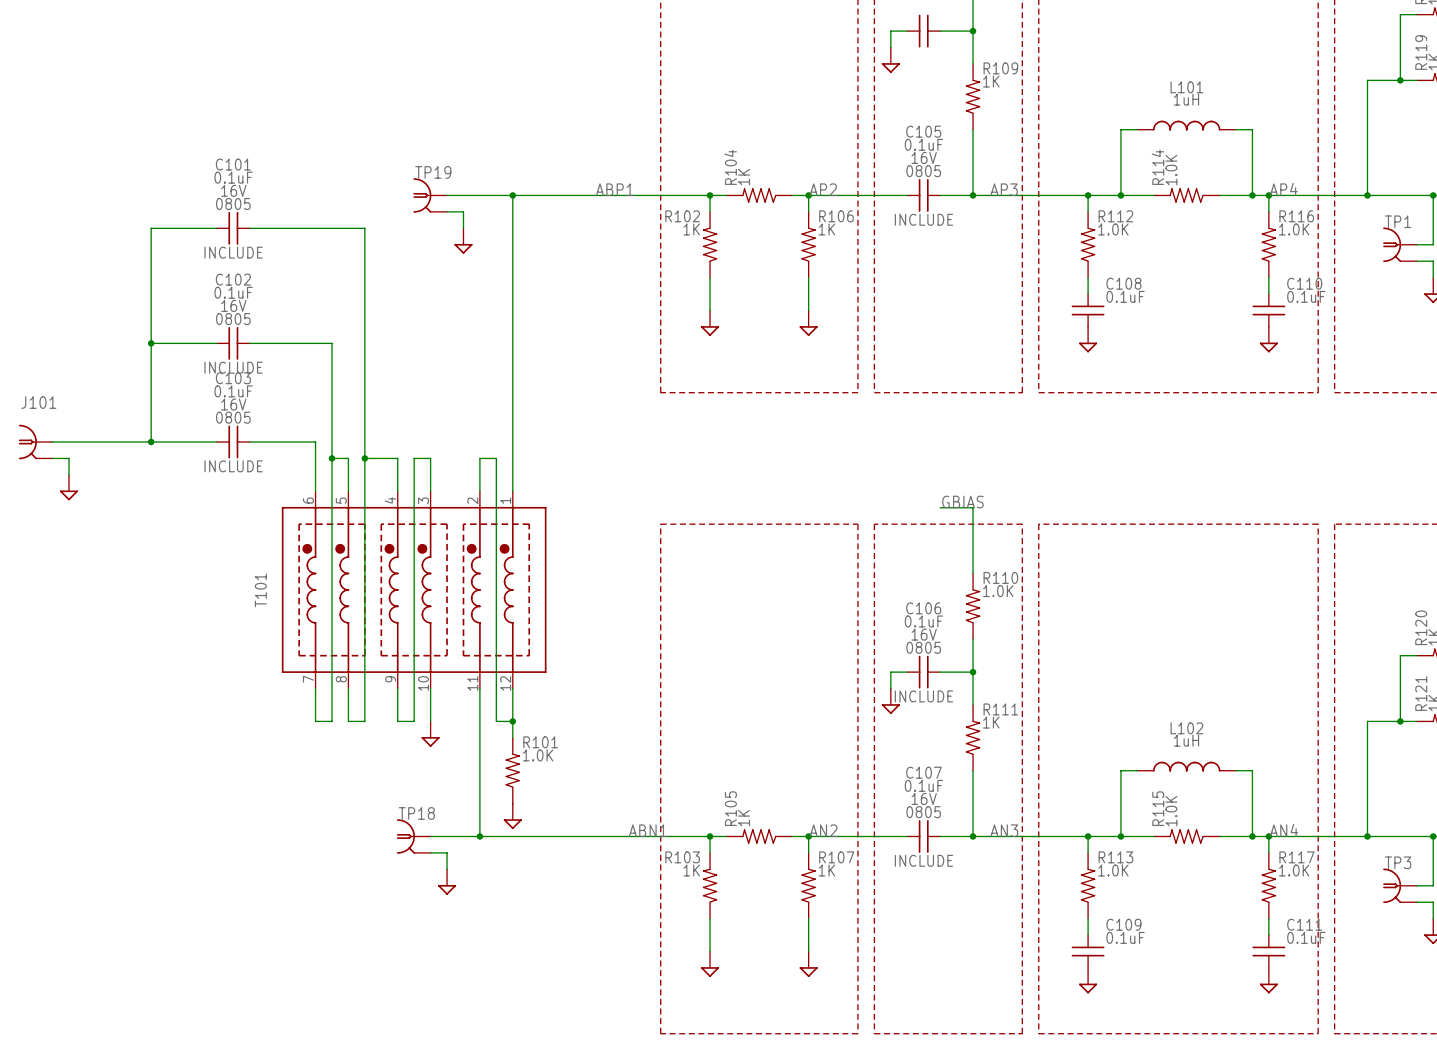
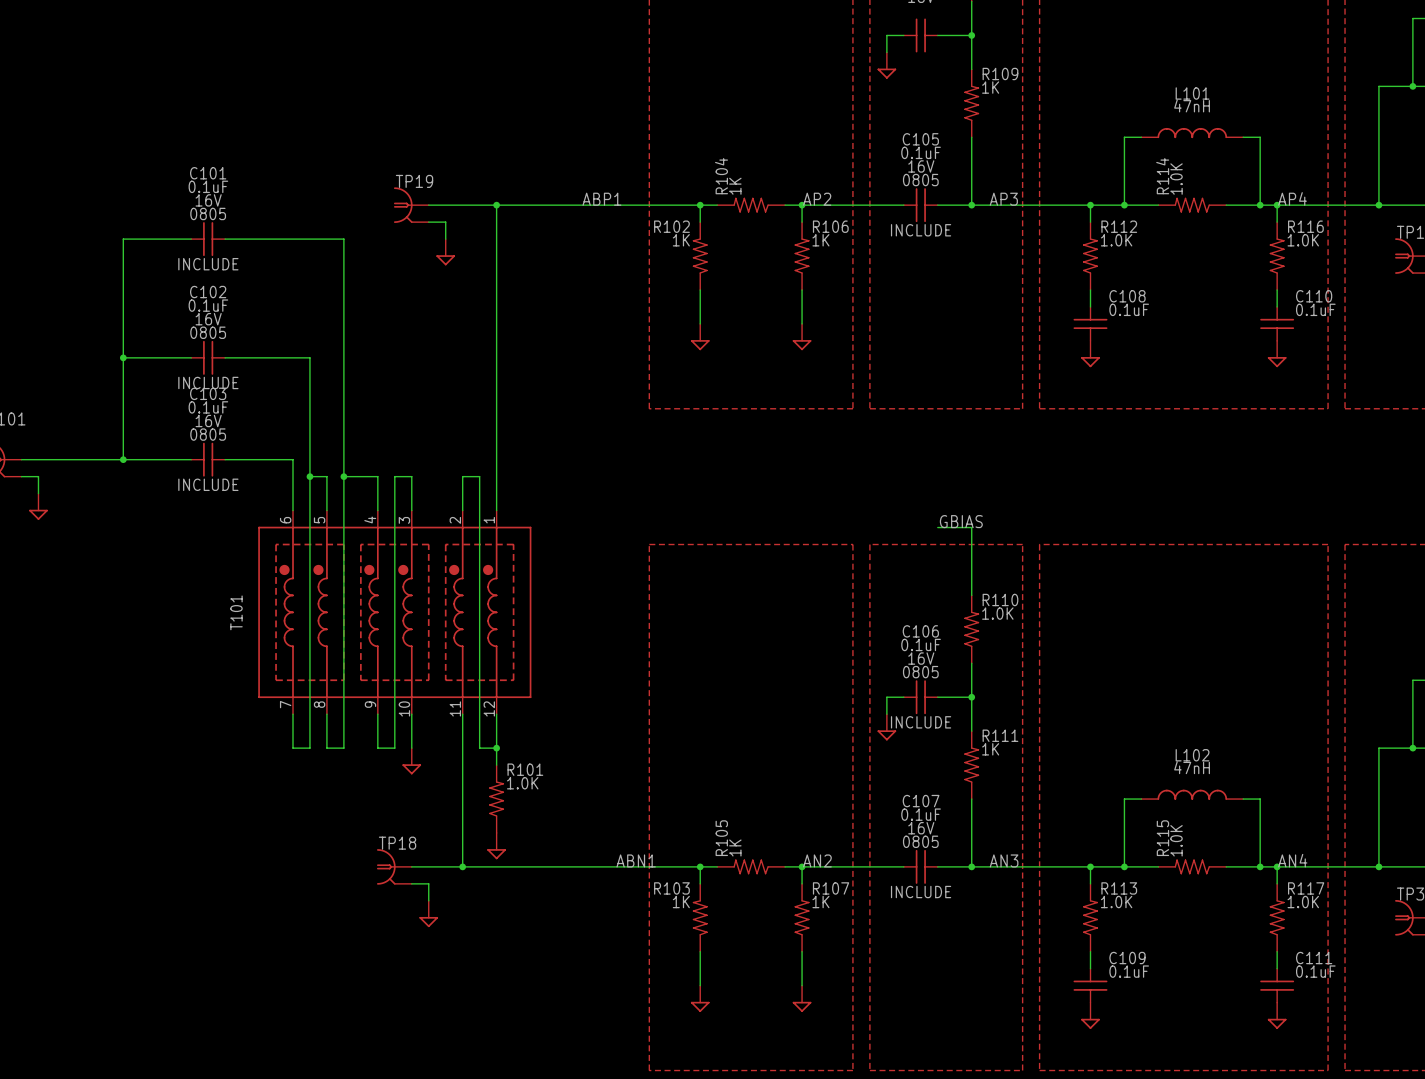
L101 value: 1uH (1186, 99) -> 47nH (1192, 105)
L102 value: 1uH (1186, 740) -> 47nH (1192, 767)

